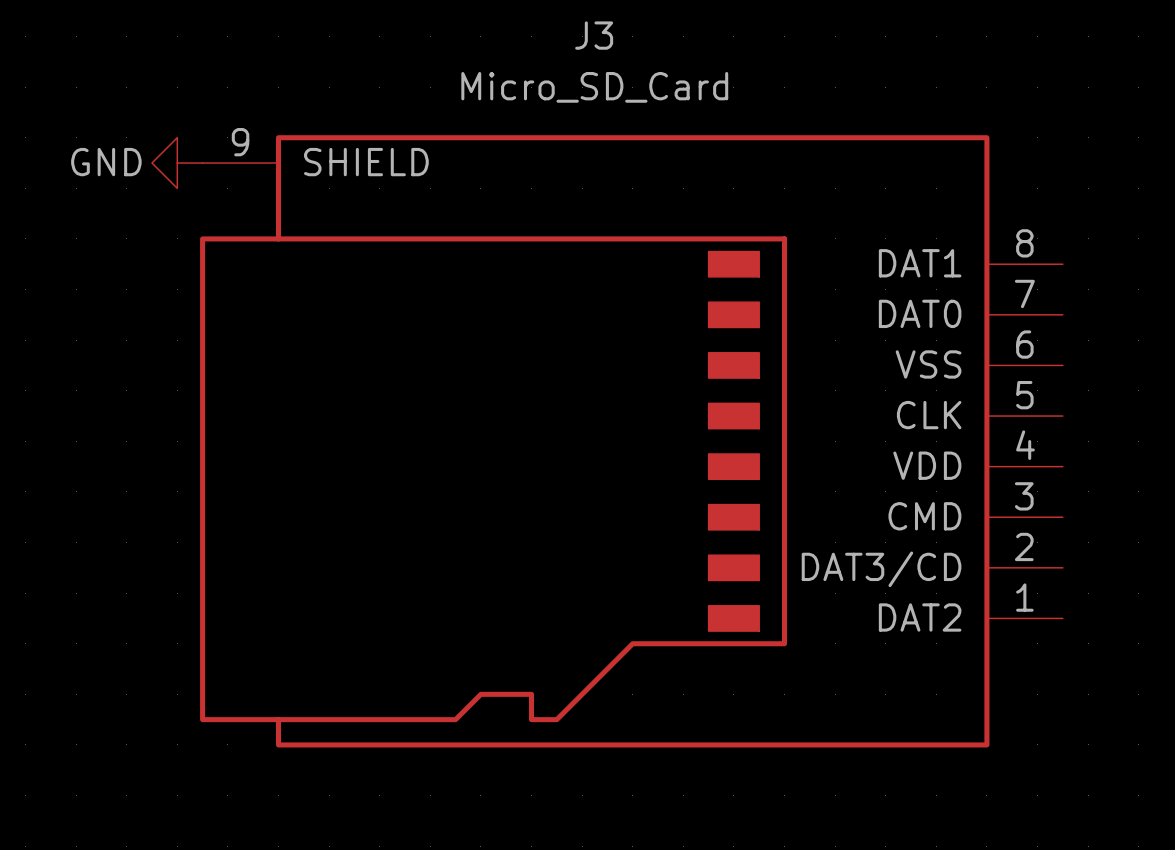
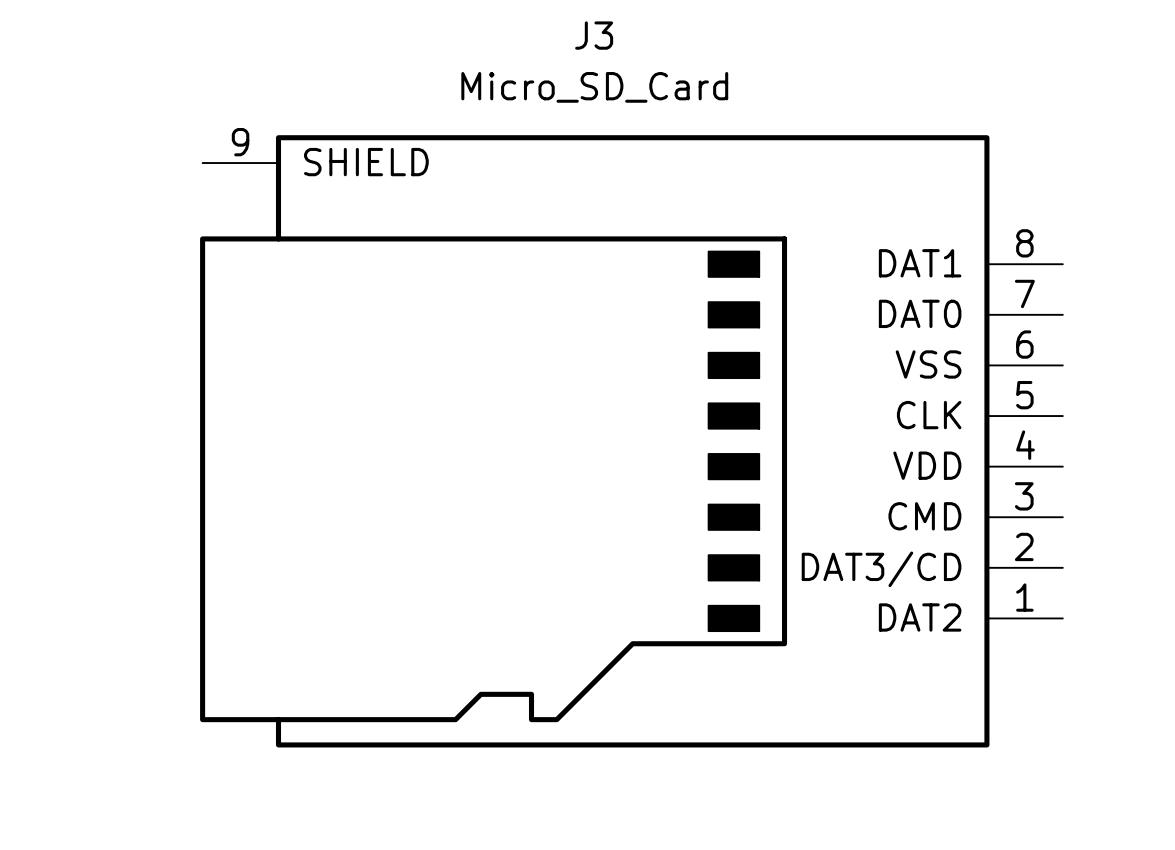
power symbol: GND (177, 163) -> none

